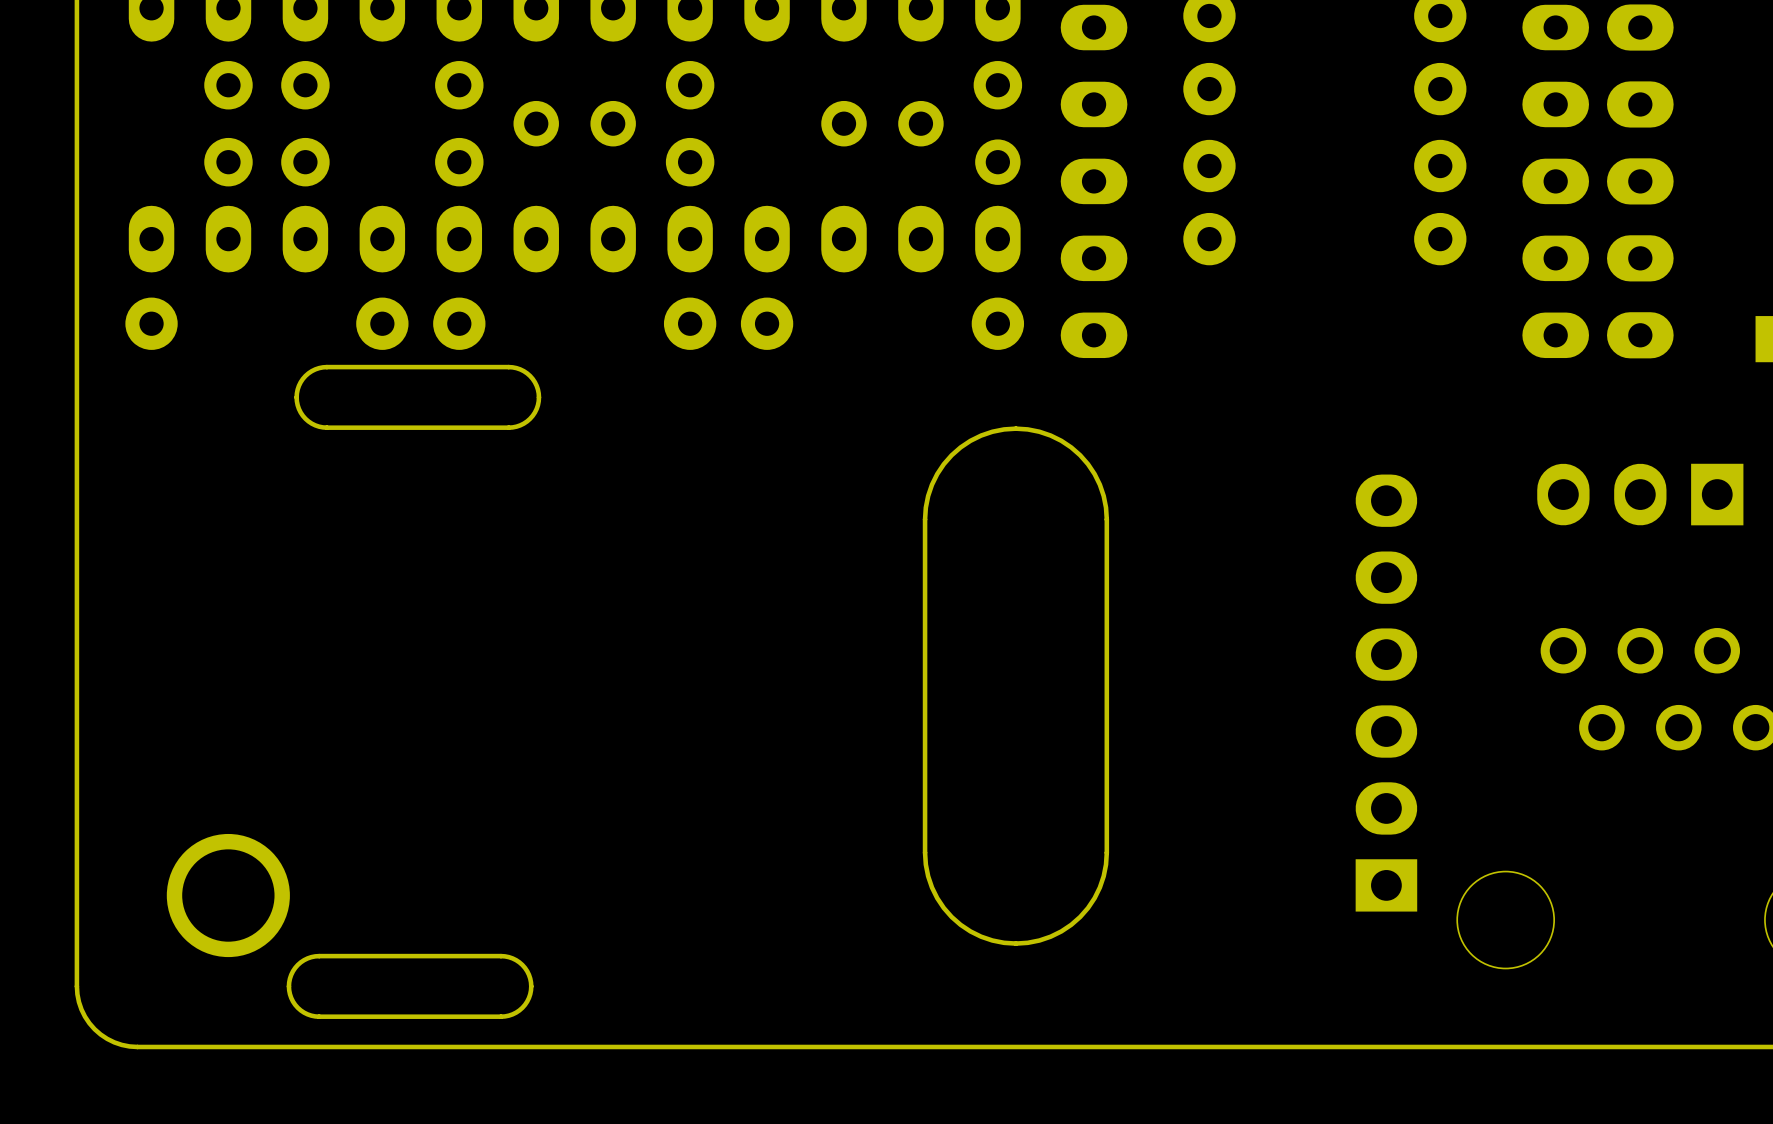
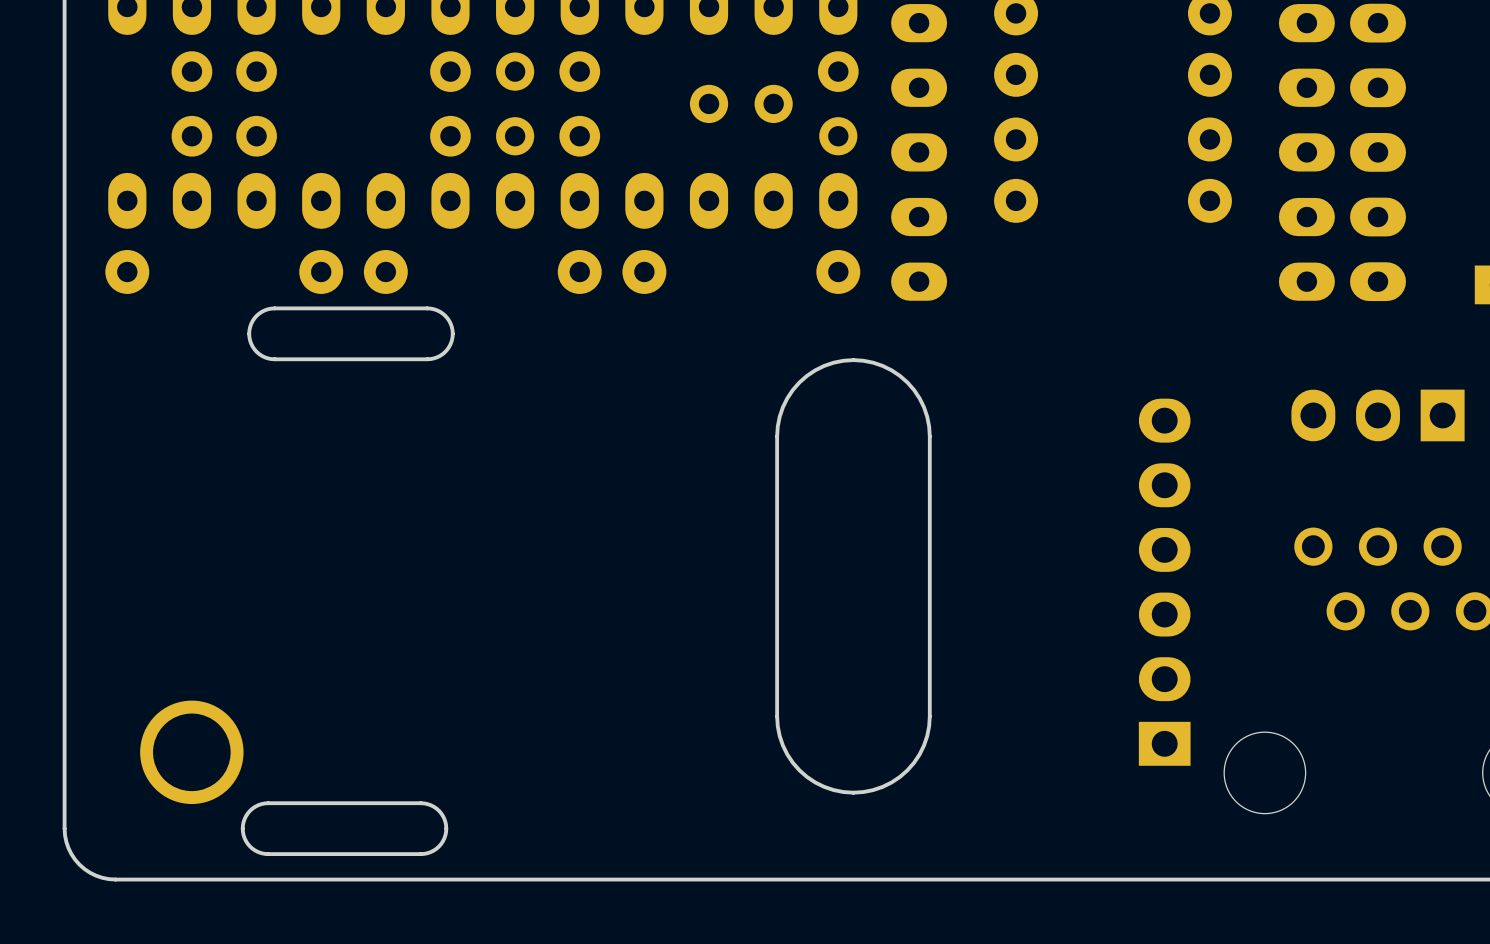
part position: (459, 123) -> (450, 103)
part rotation: 0° (574, 123) -> 90° clockwise (515, 103)

